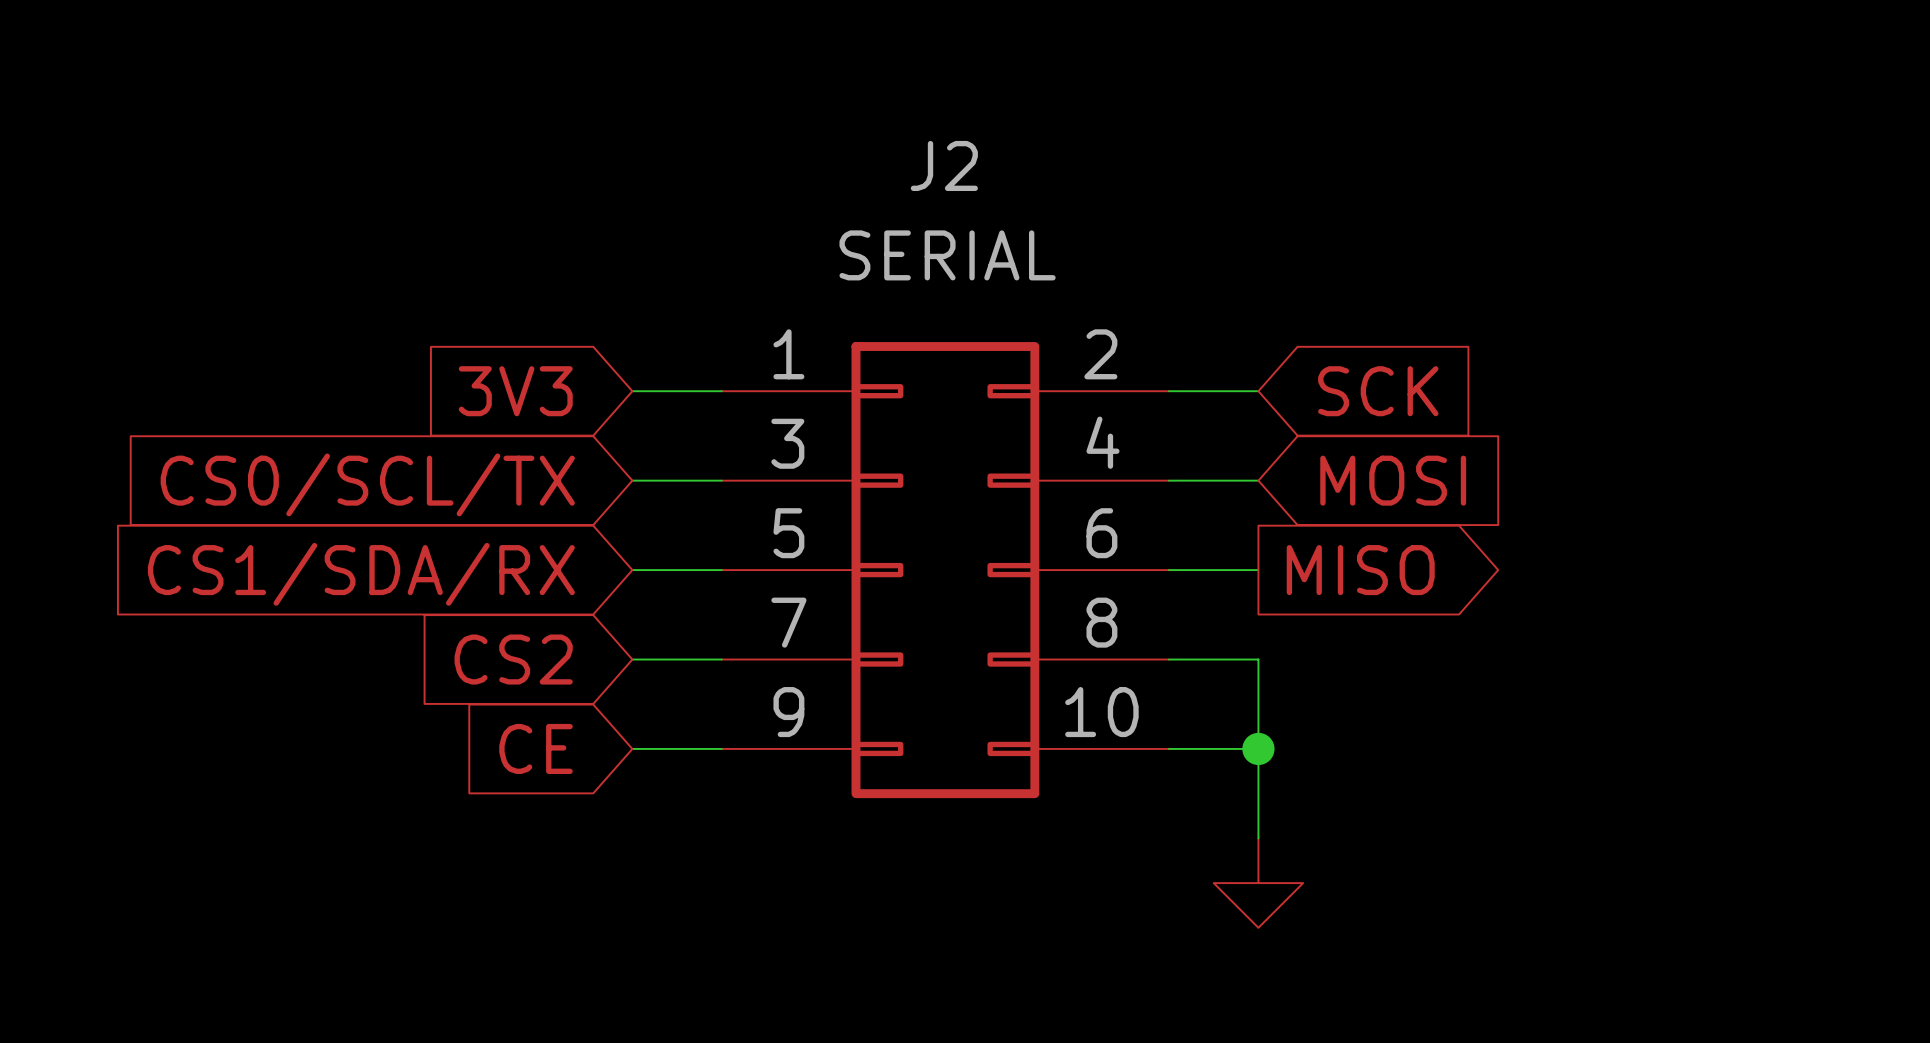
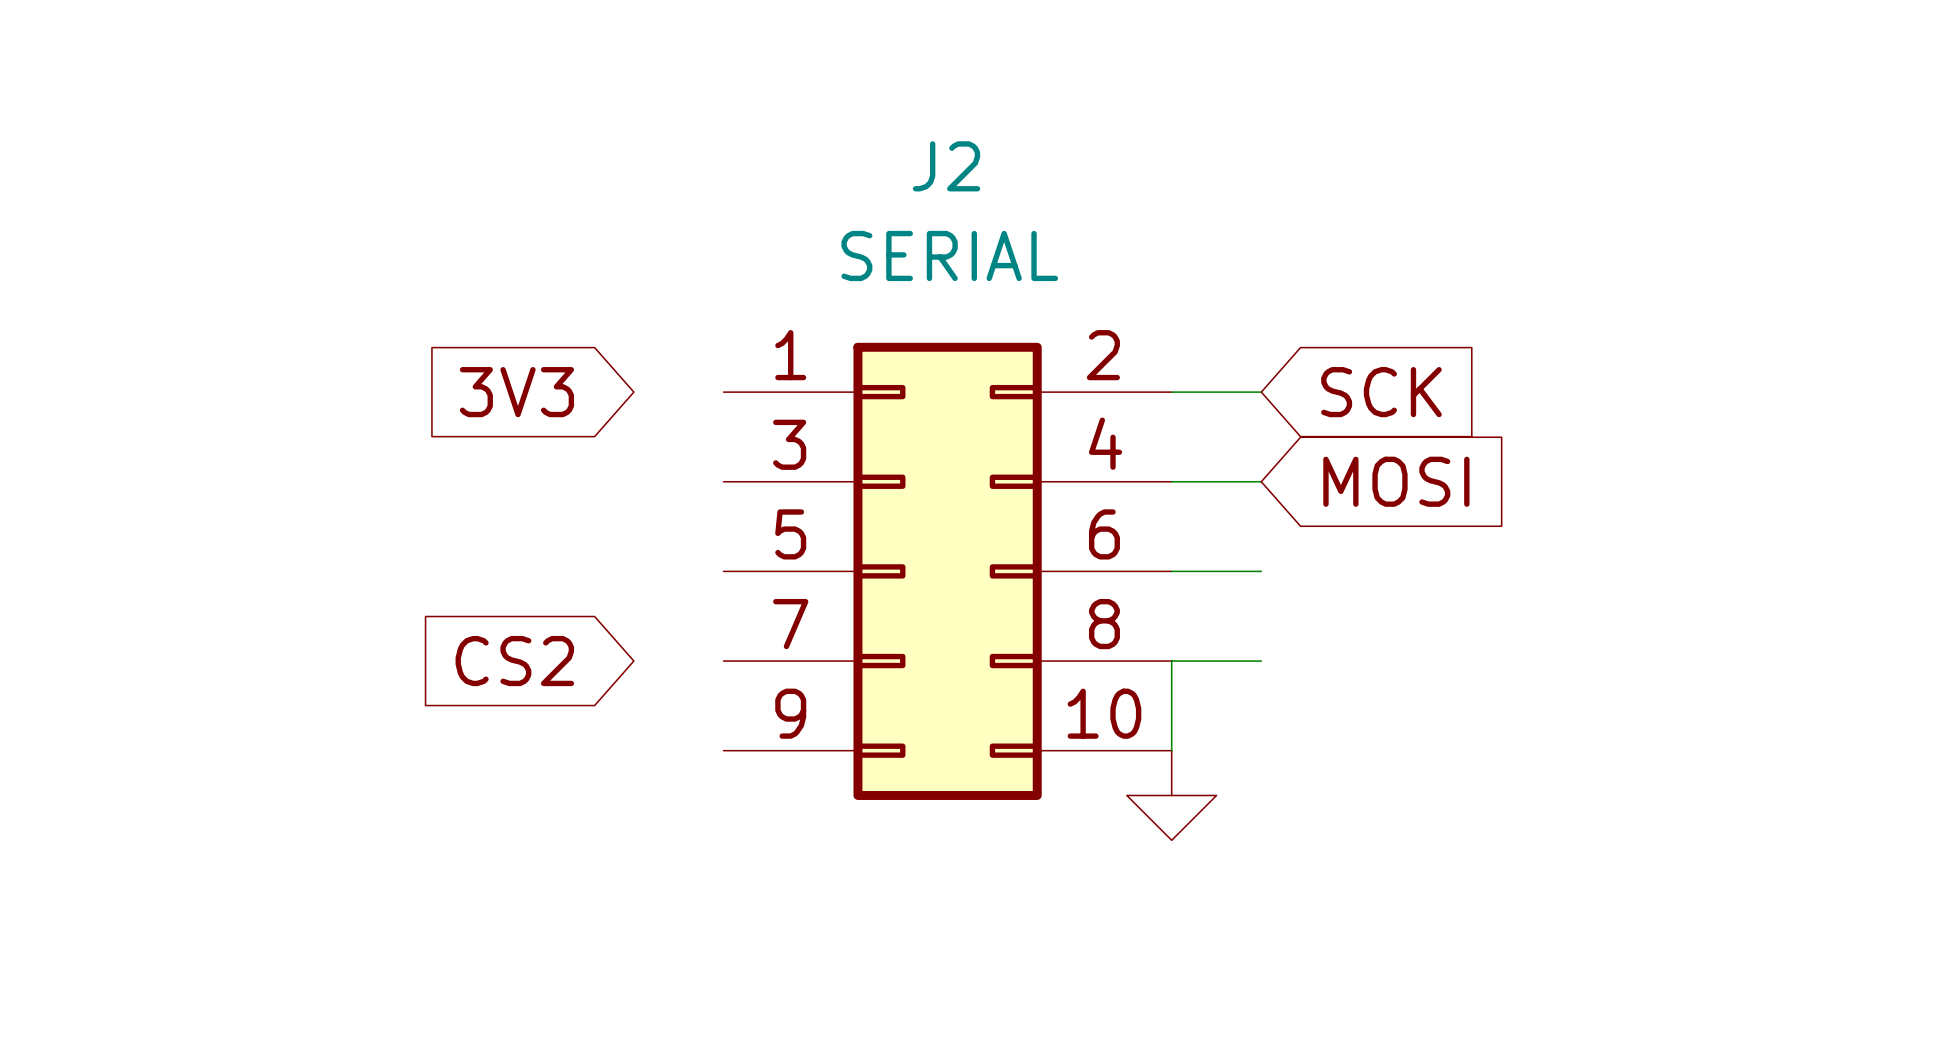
wire: (632, 391) (721, 391) -> none
wire: (632, 480) (721, 480) -> none
global label: CS0/SCL/TX (367, 484) -> none
wire: (632, 570) (721, 570) -> none
global label: MISO (1360, 570) -> none
global label: CS1/SDA/RX (361, 574) -> none
wire: (632, 659) (721, 659) -> none
wire: (1258, 659) (1258, 838) -> none
global label: CE (535, 748) -> none
wire: (632, 748) (721, 748) -> none
wire: (1169, 748) (1258, 748) -> (1171, 750) (1171, 661)
junction: (1258, 748) -> none
power symbol position: (1258, 883) -> (1171, 795)

